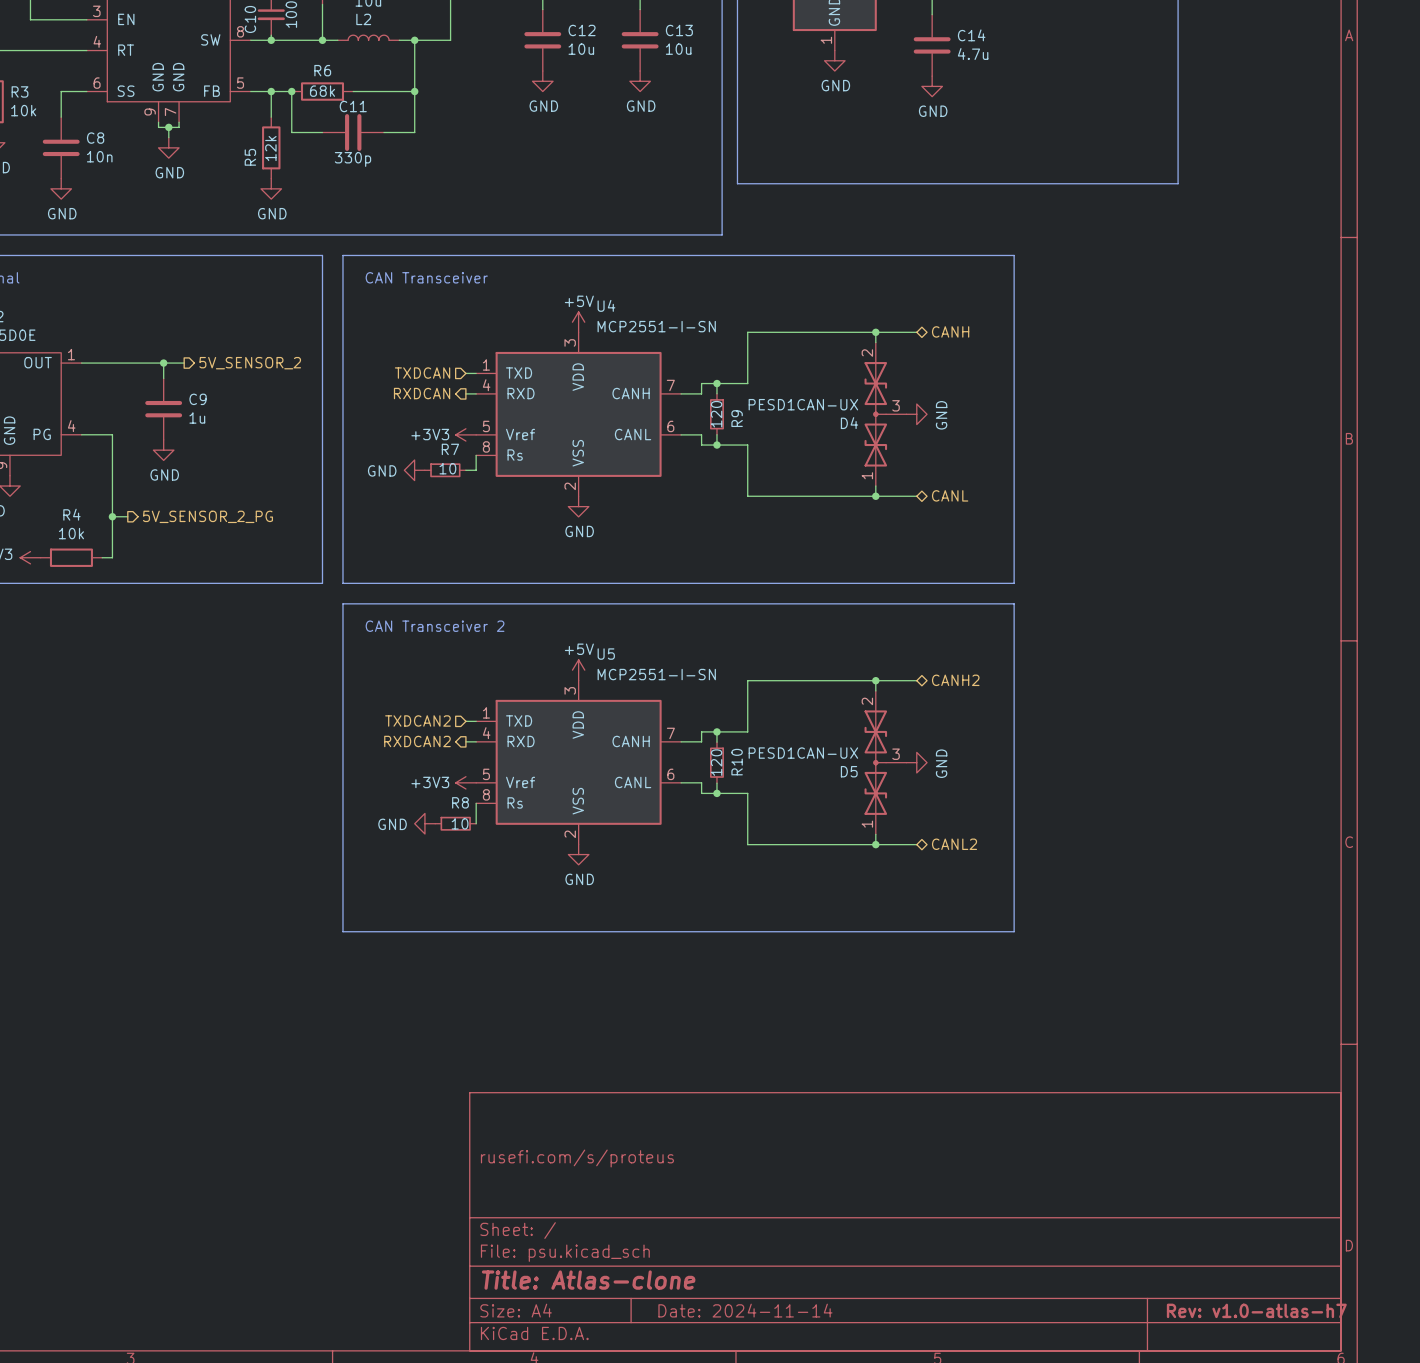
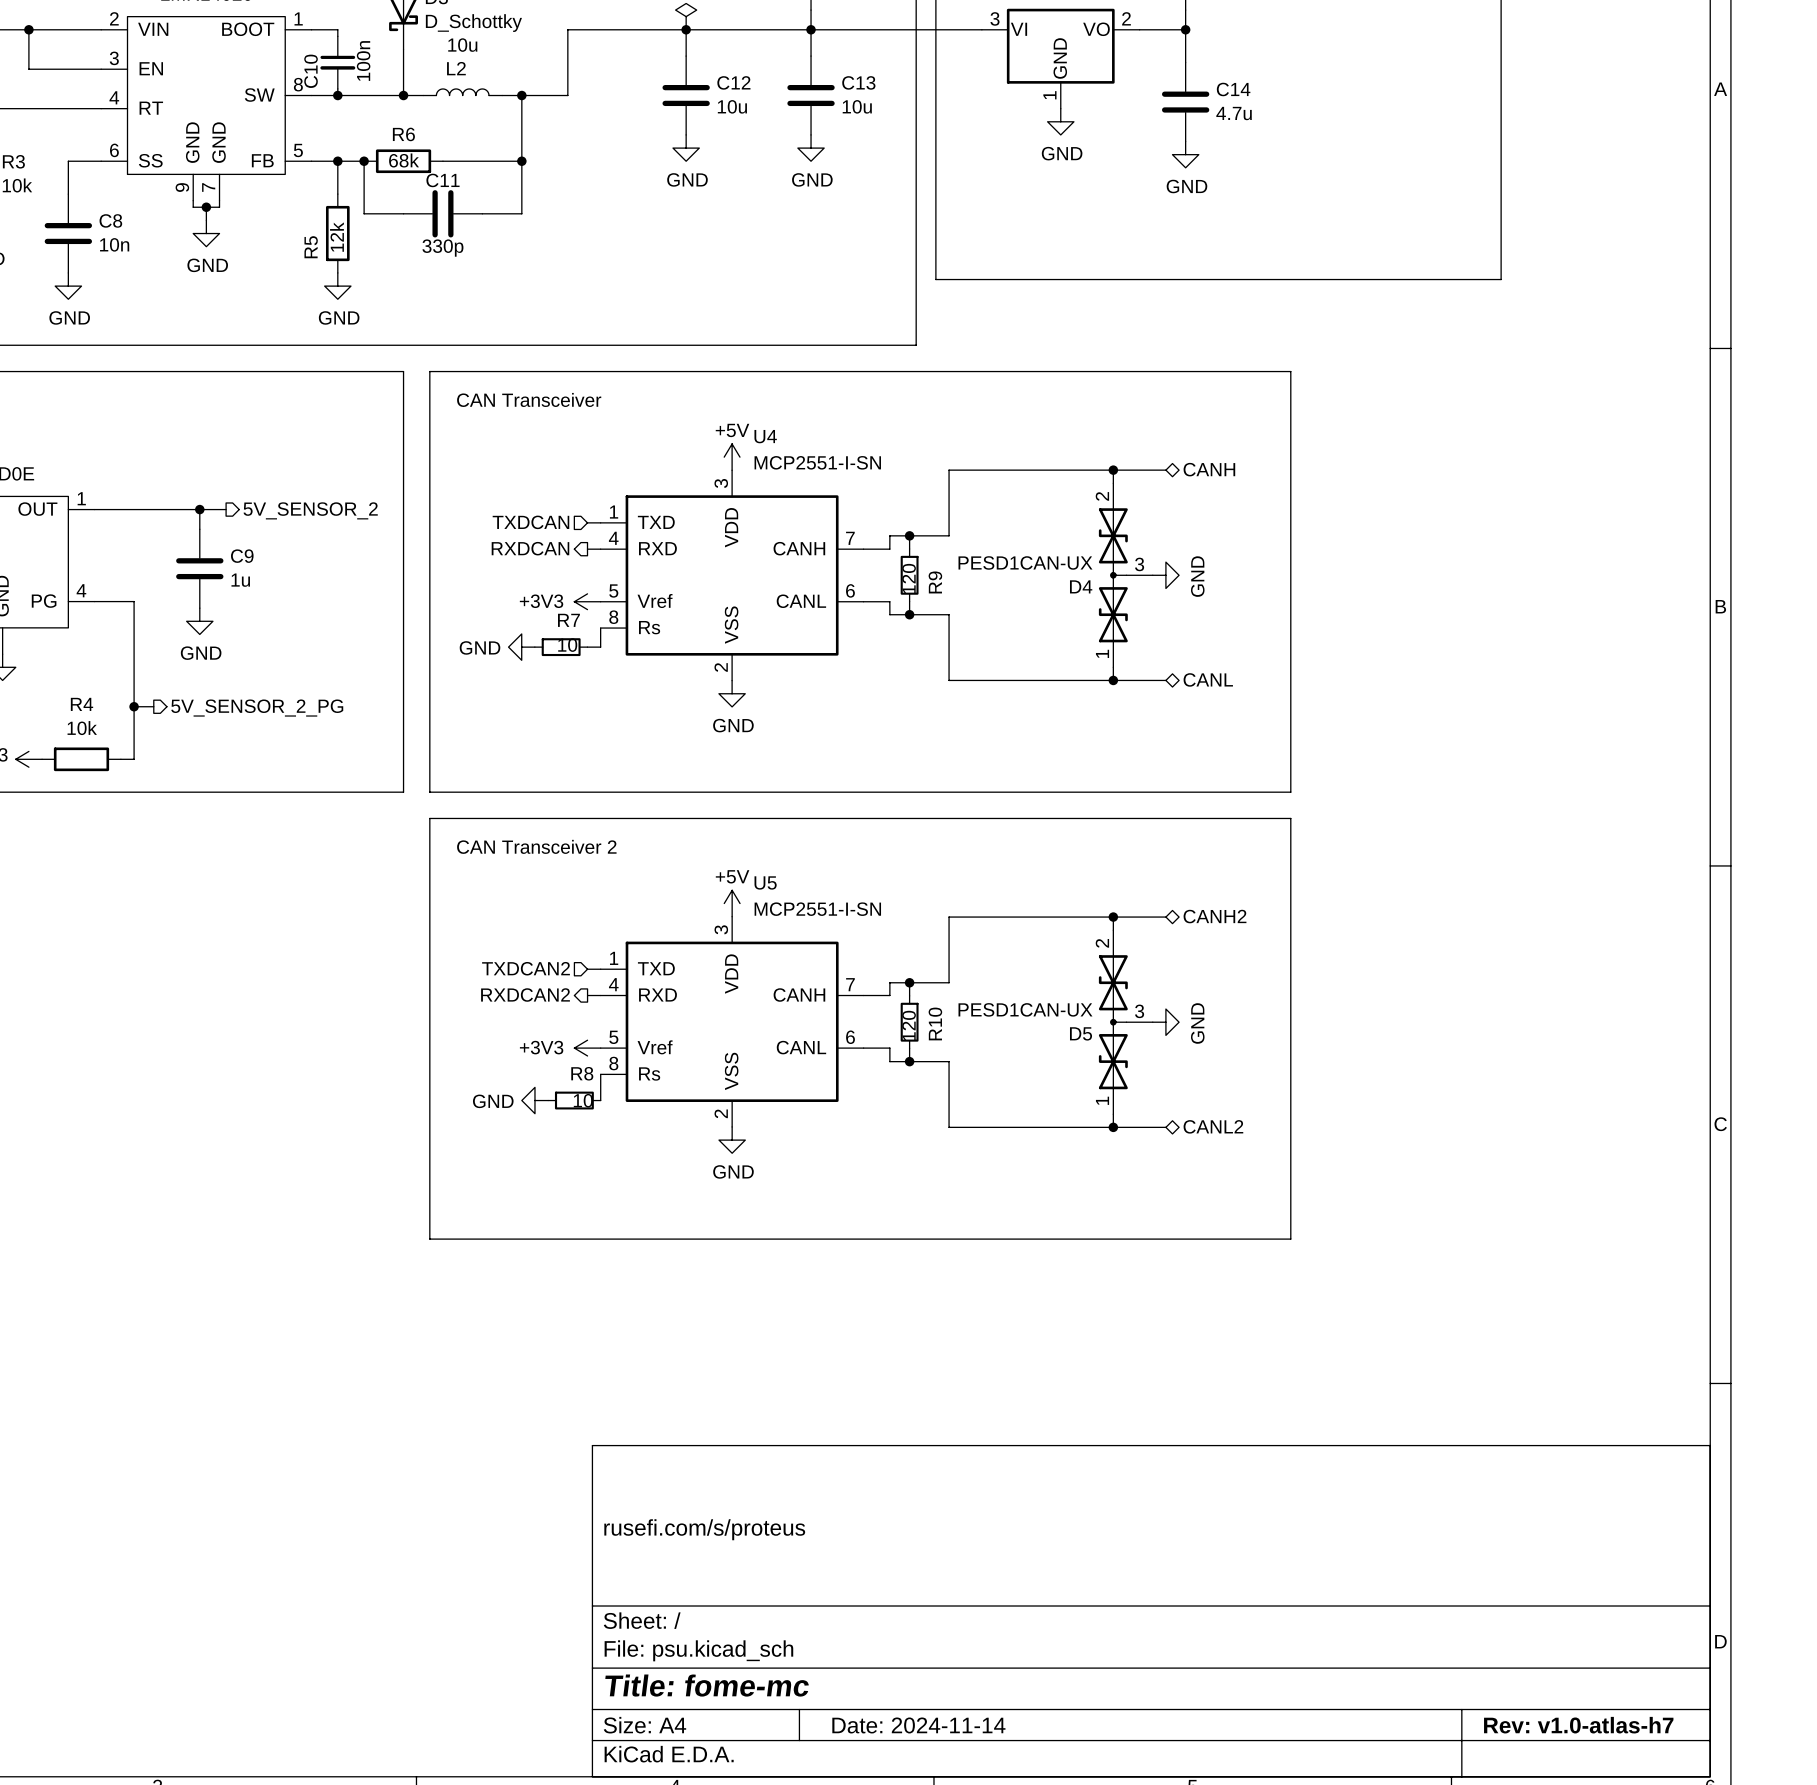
title block: Title: Atlas-clone (588, 1280) -> Title: fome-mc (707, 1685)

